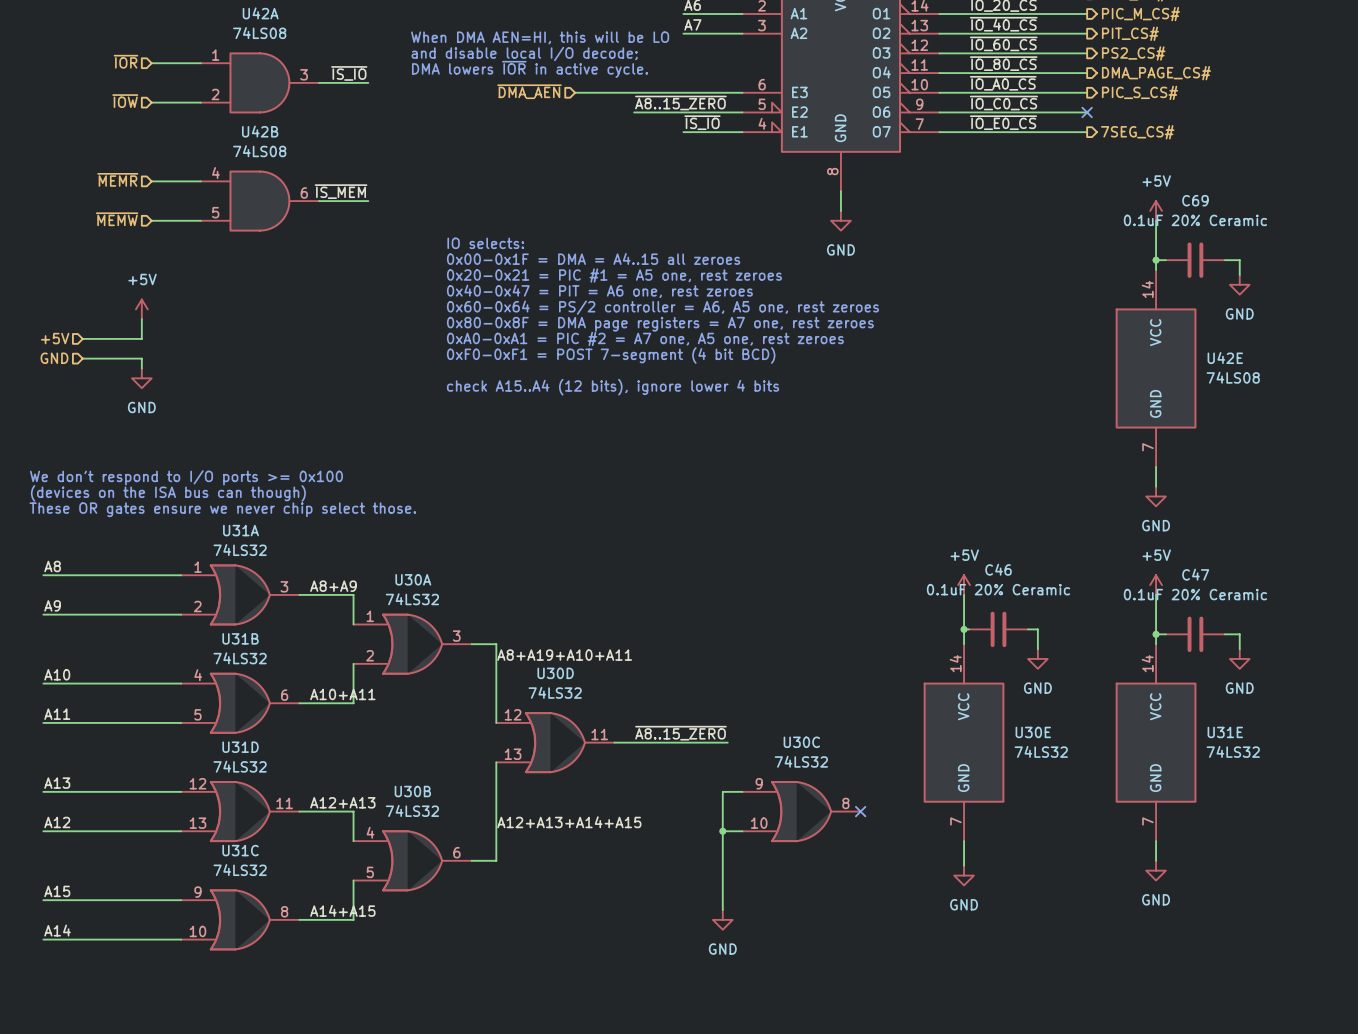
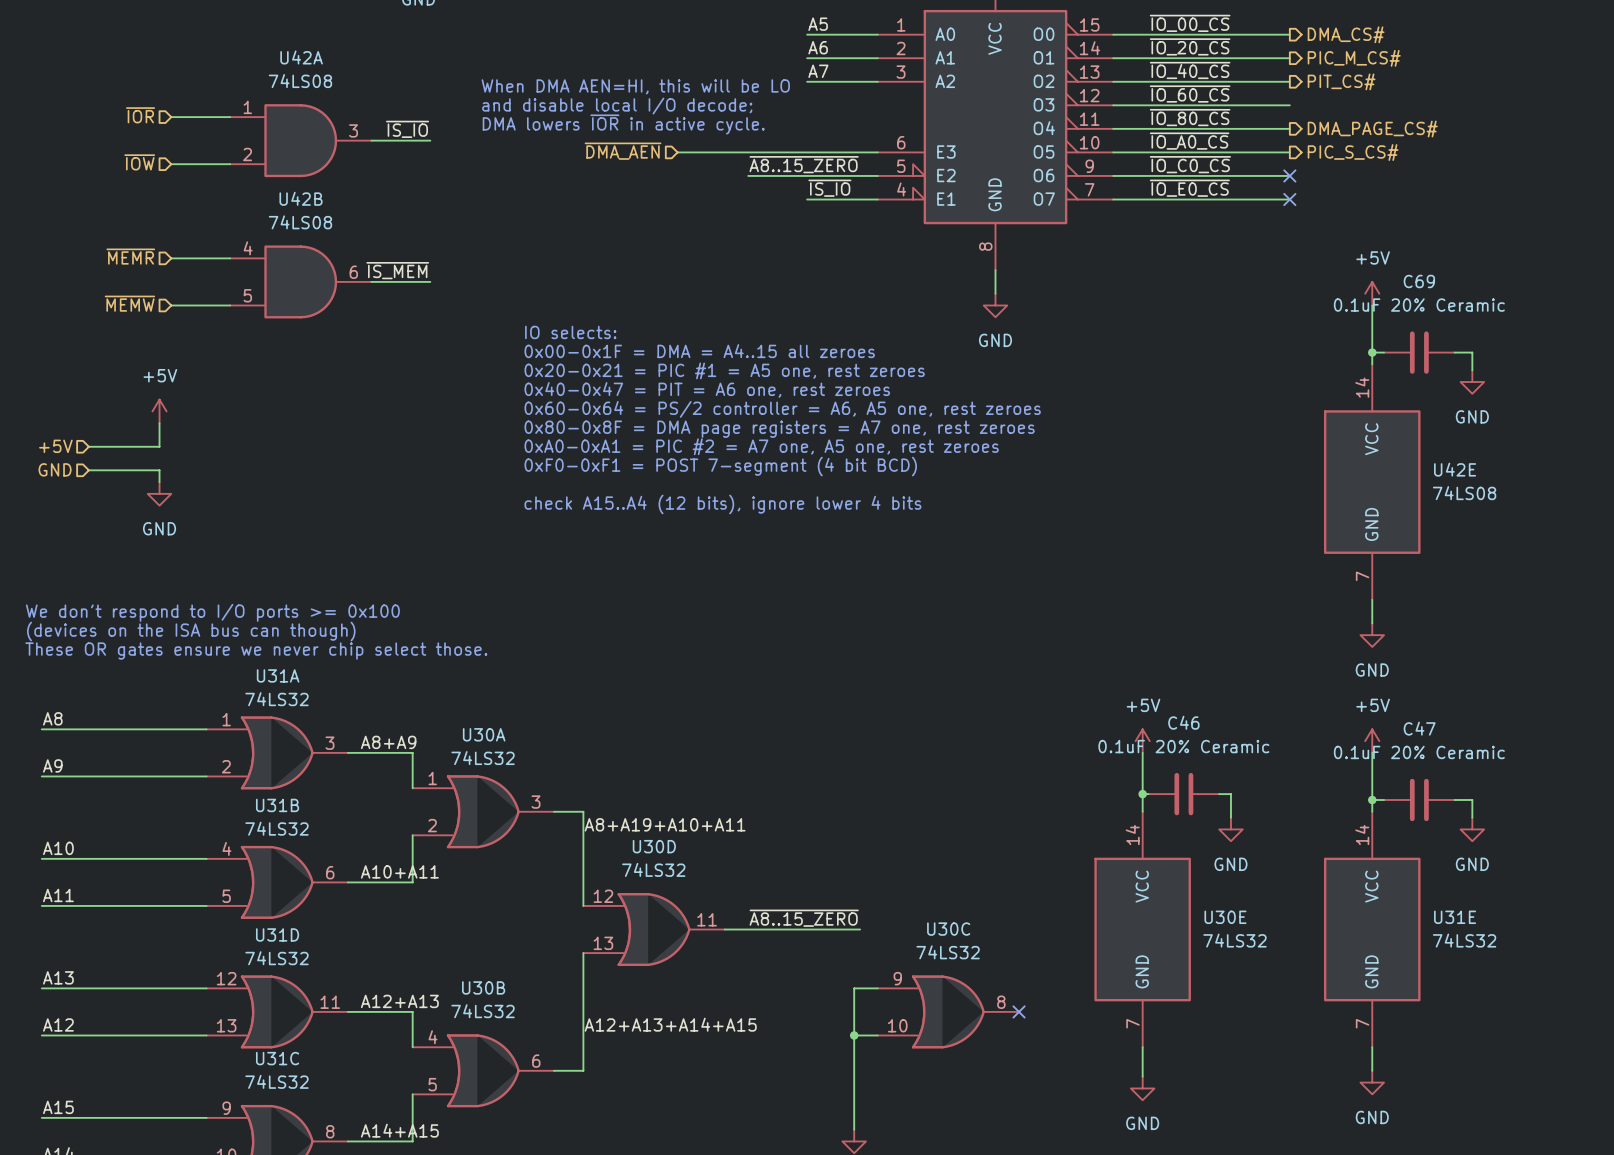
hierarchical label: PS2_CS# (1133, 53) -> none
no-connect mark: none -> (1289, 199)
hierarchical label: 7SEG_CS# (1137, 132) -> none

